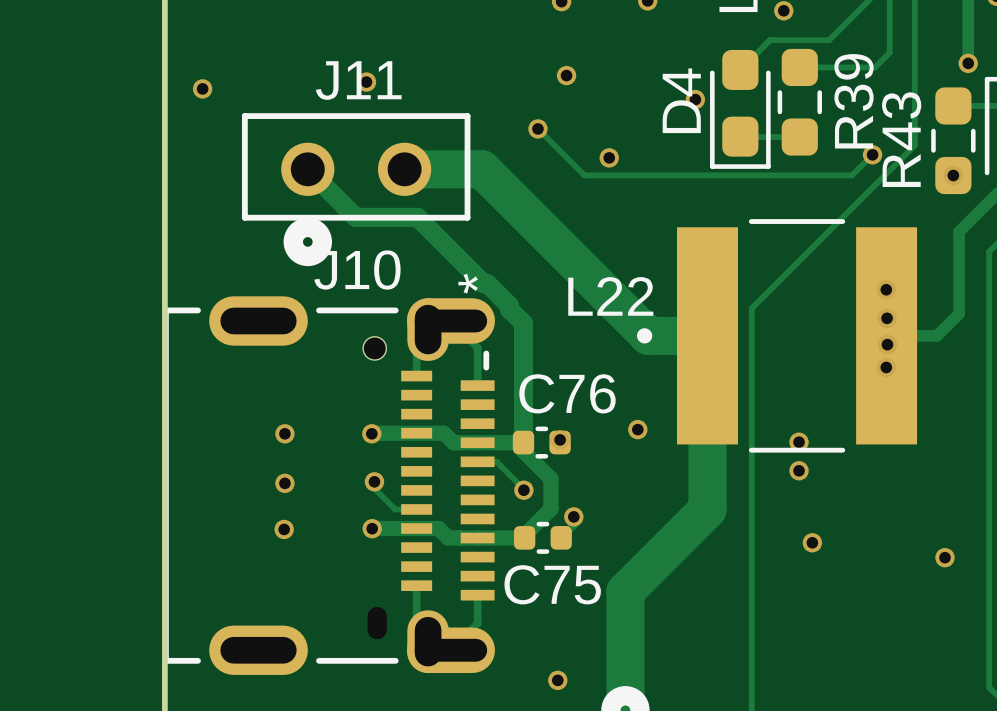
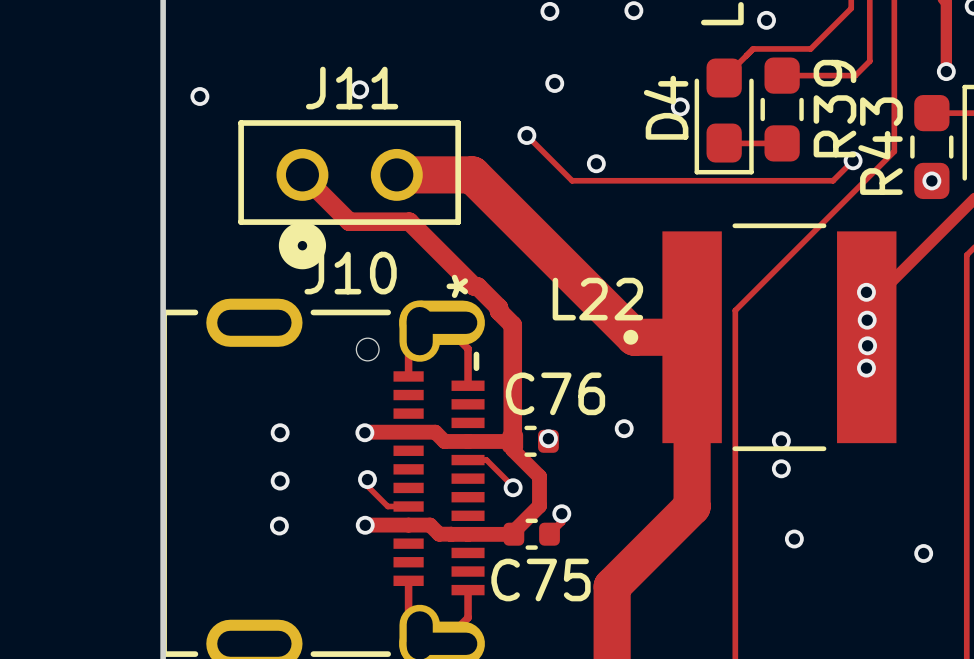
track: (959, 231) (959, 313) (936, 335) (886, 335) -> (937, 235) (866, 306)

